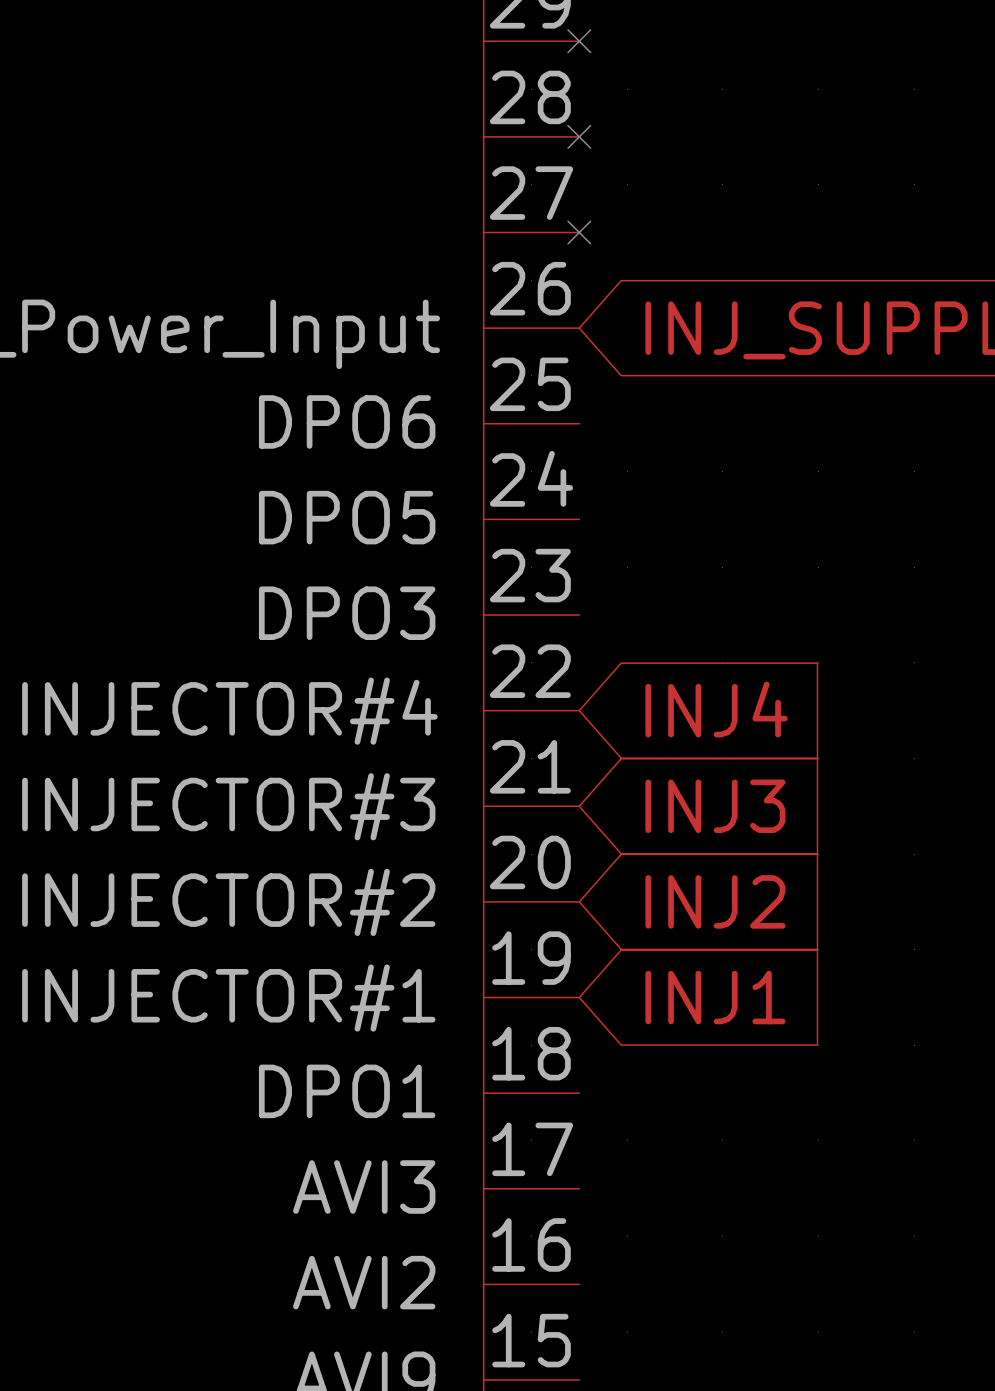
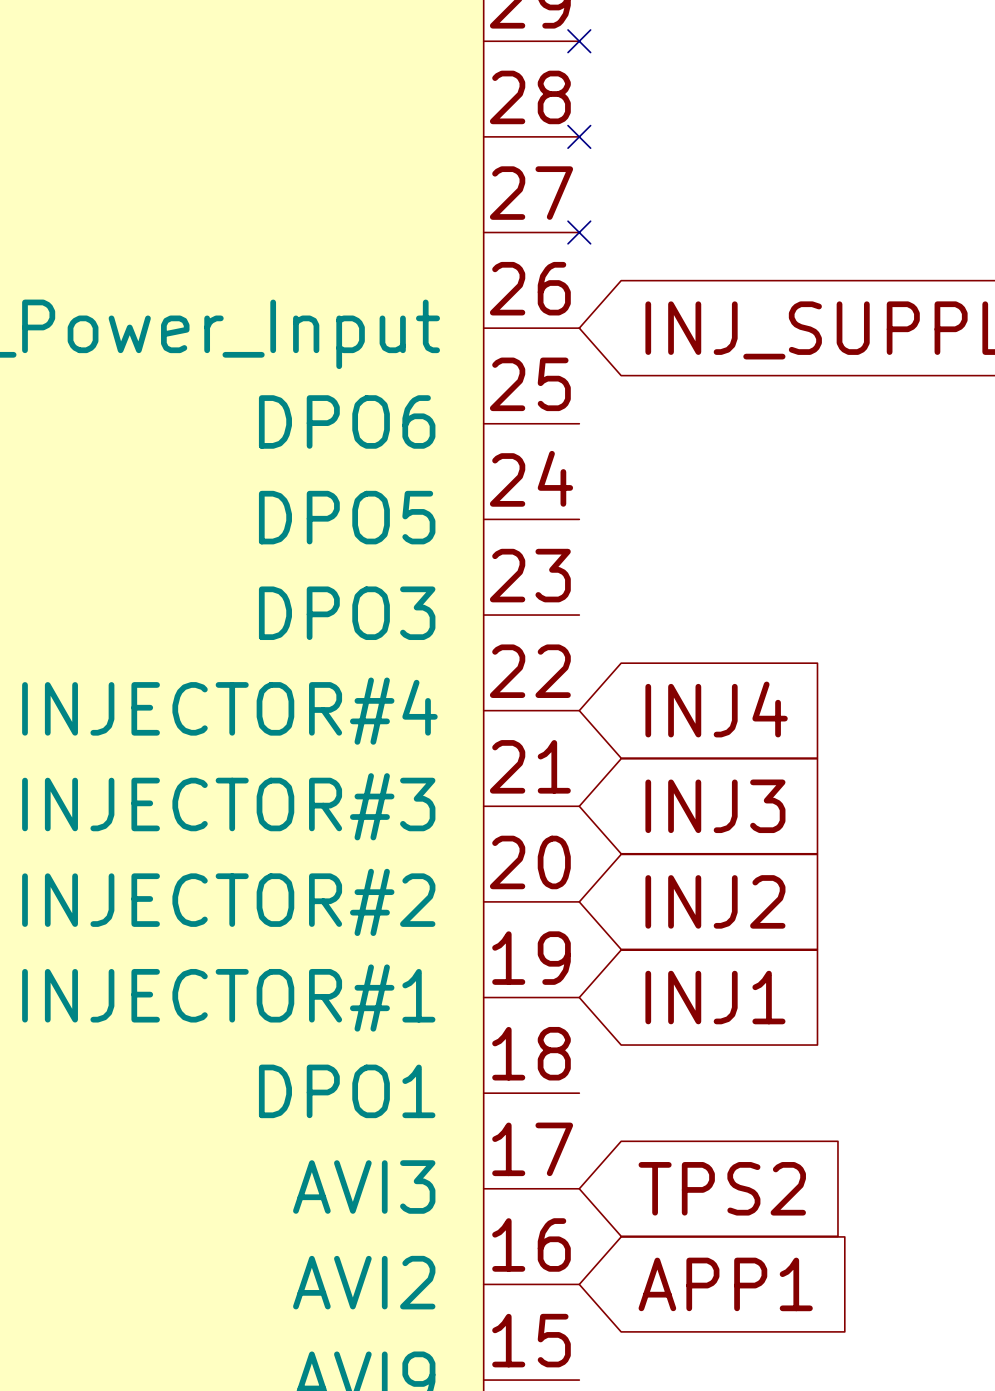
global label: none -> TPS2 (722, 1188)
global label: none -> APP1 (725, 1284)

